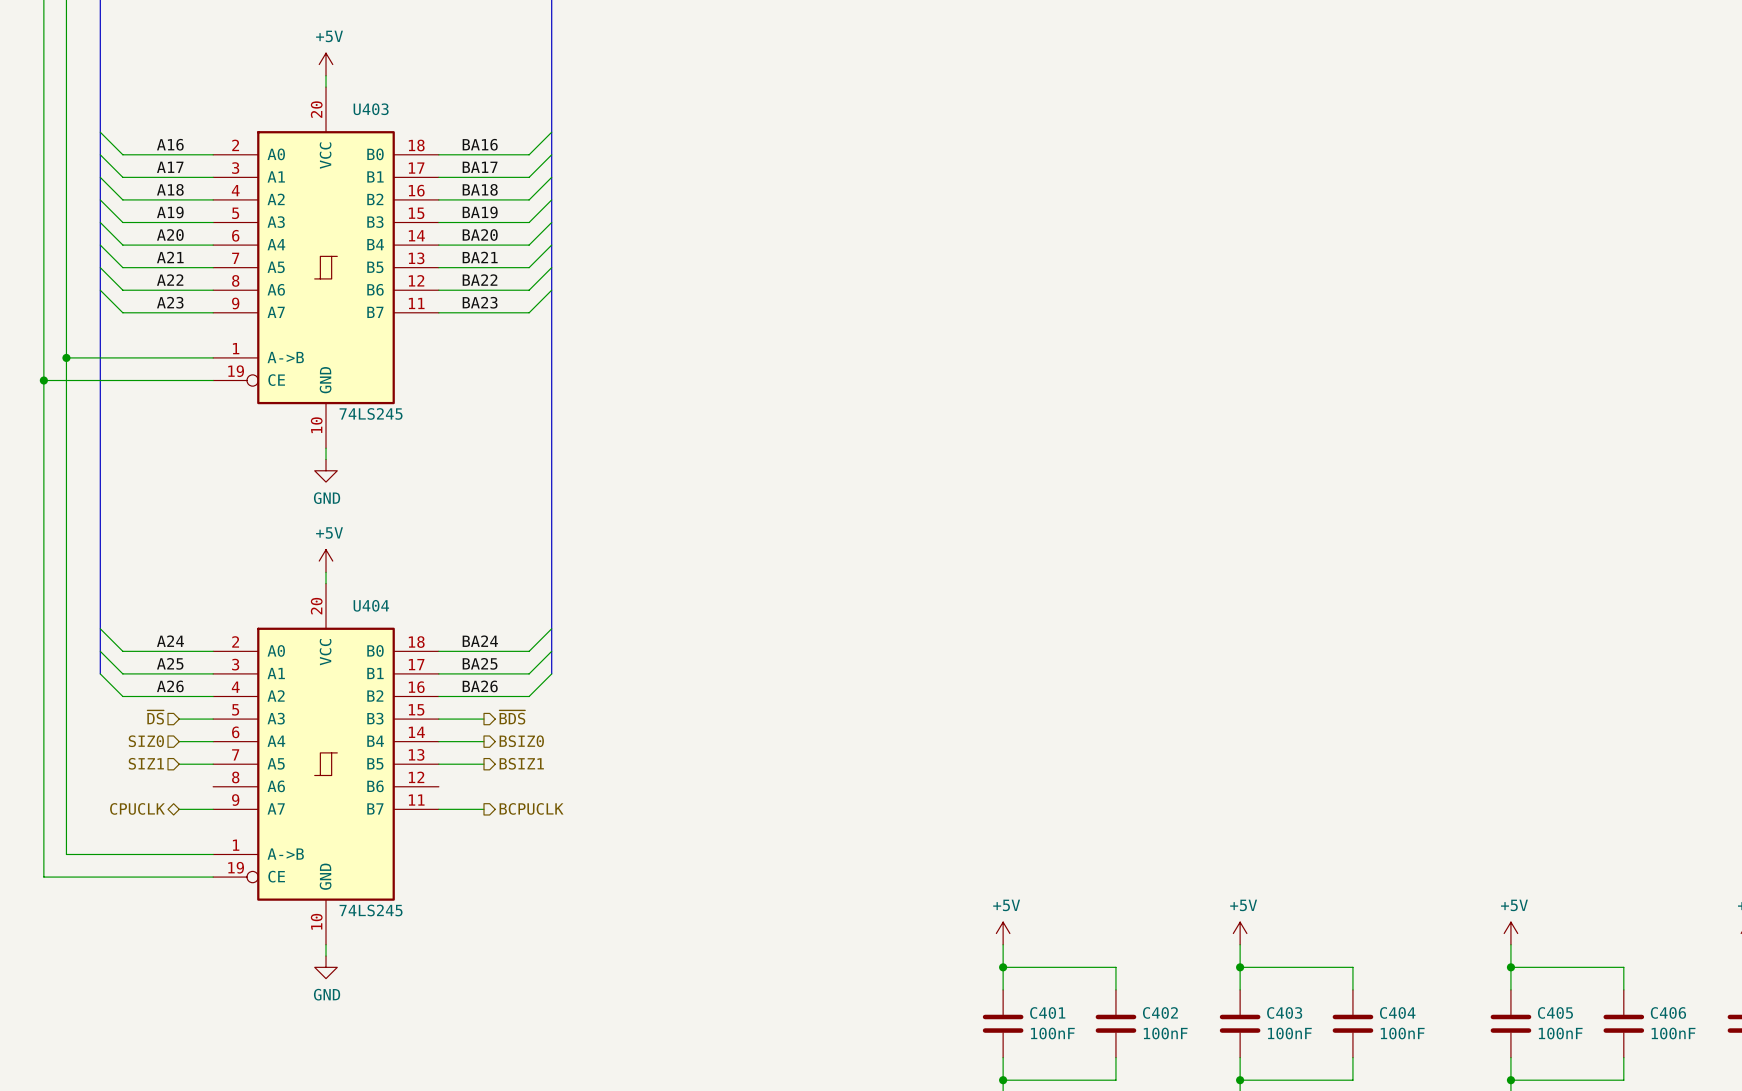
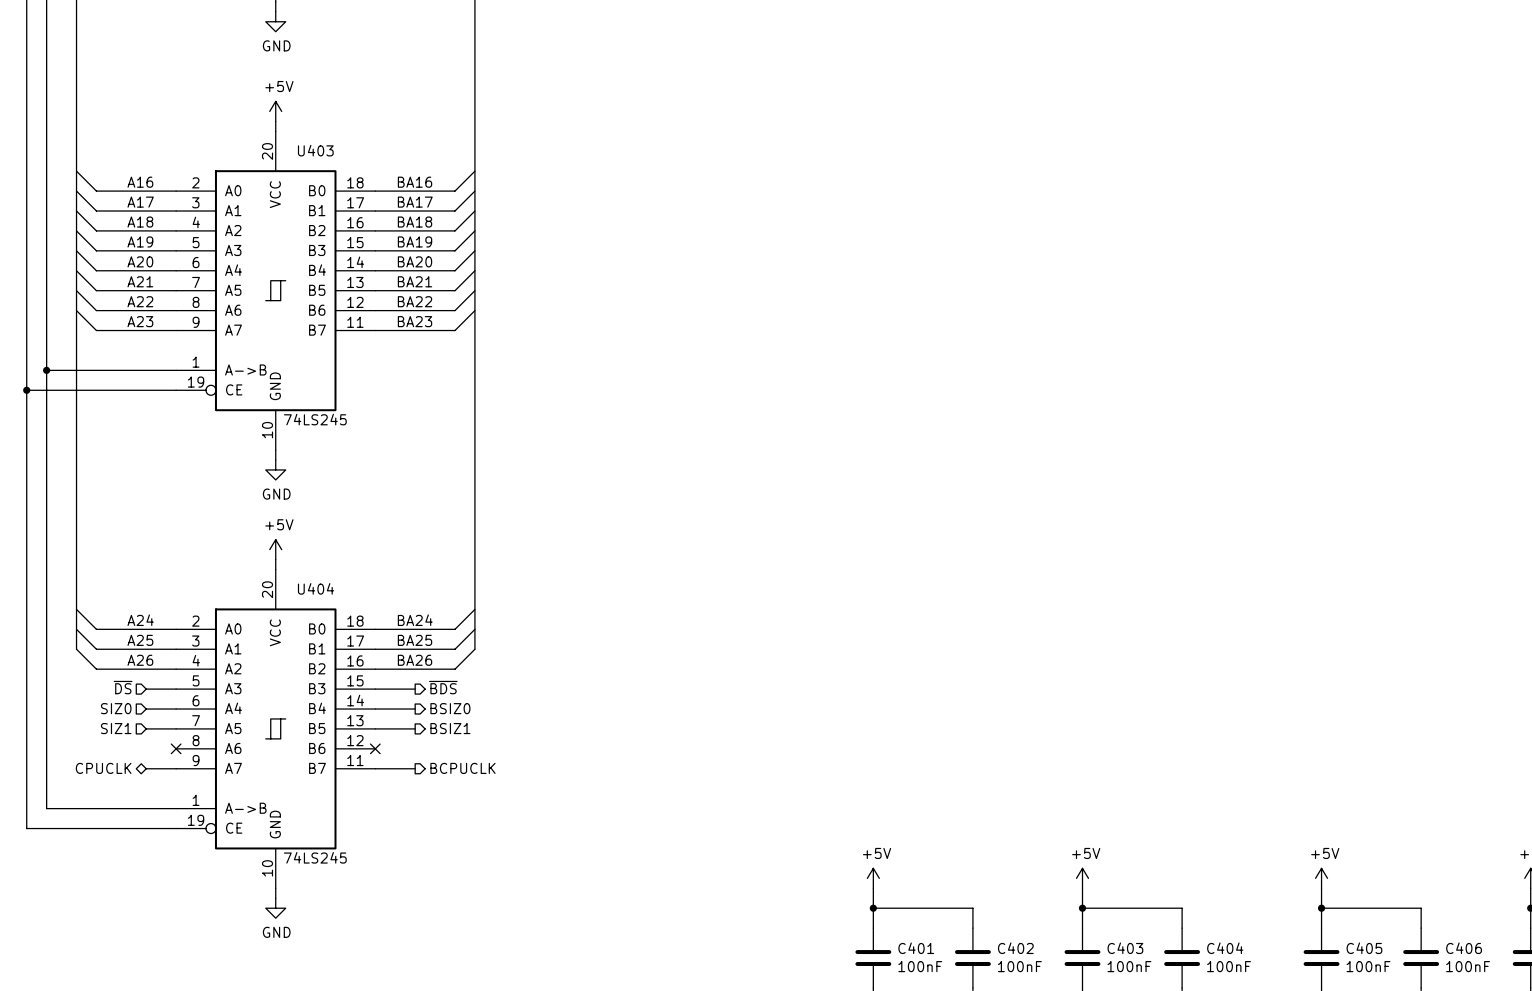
no-connect mark: none -> (176, 748)
no-connect mark: none -> (375, 748)

